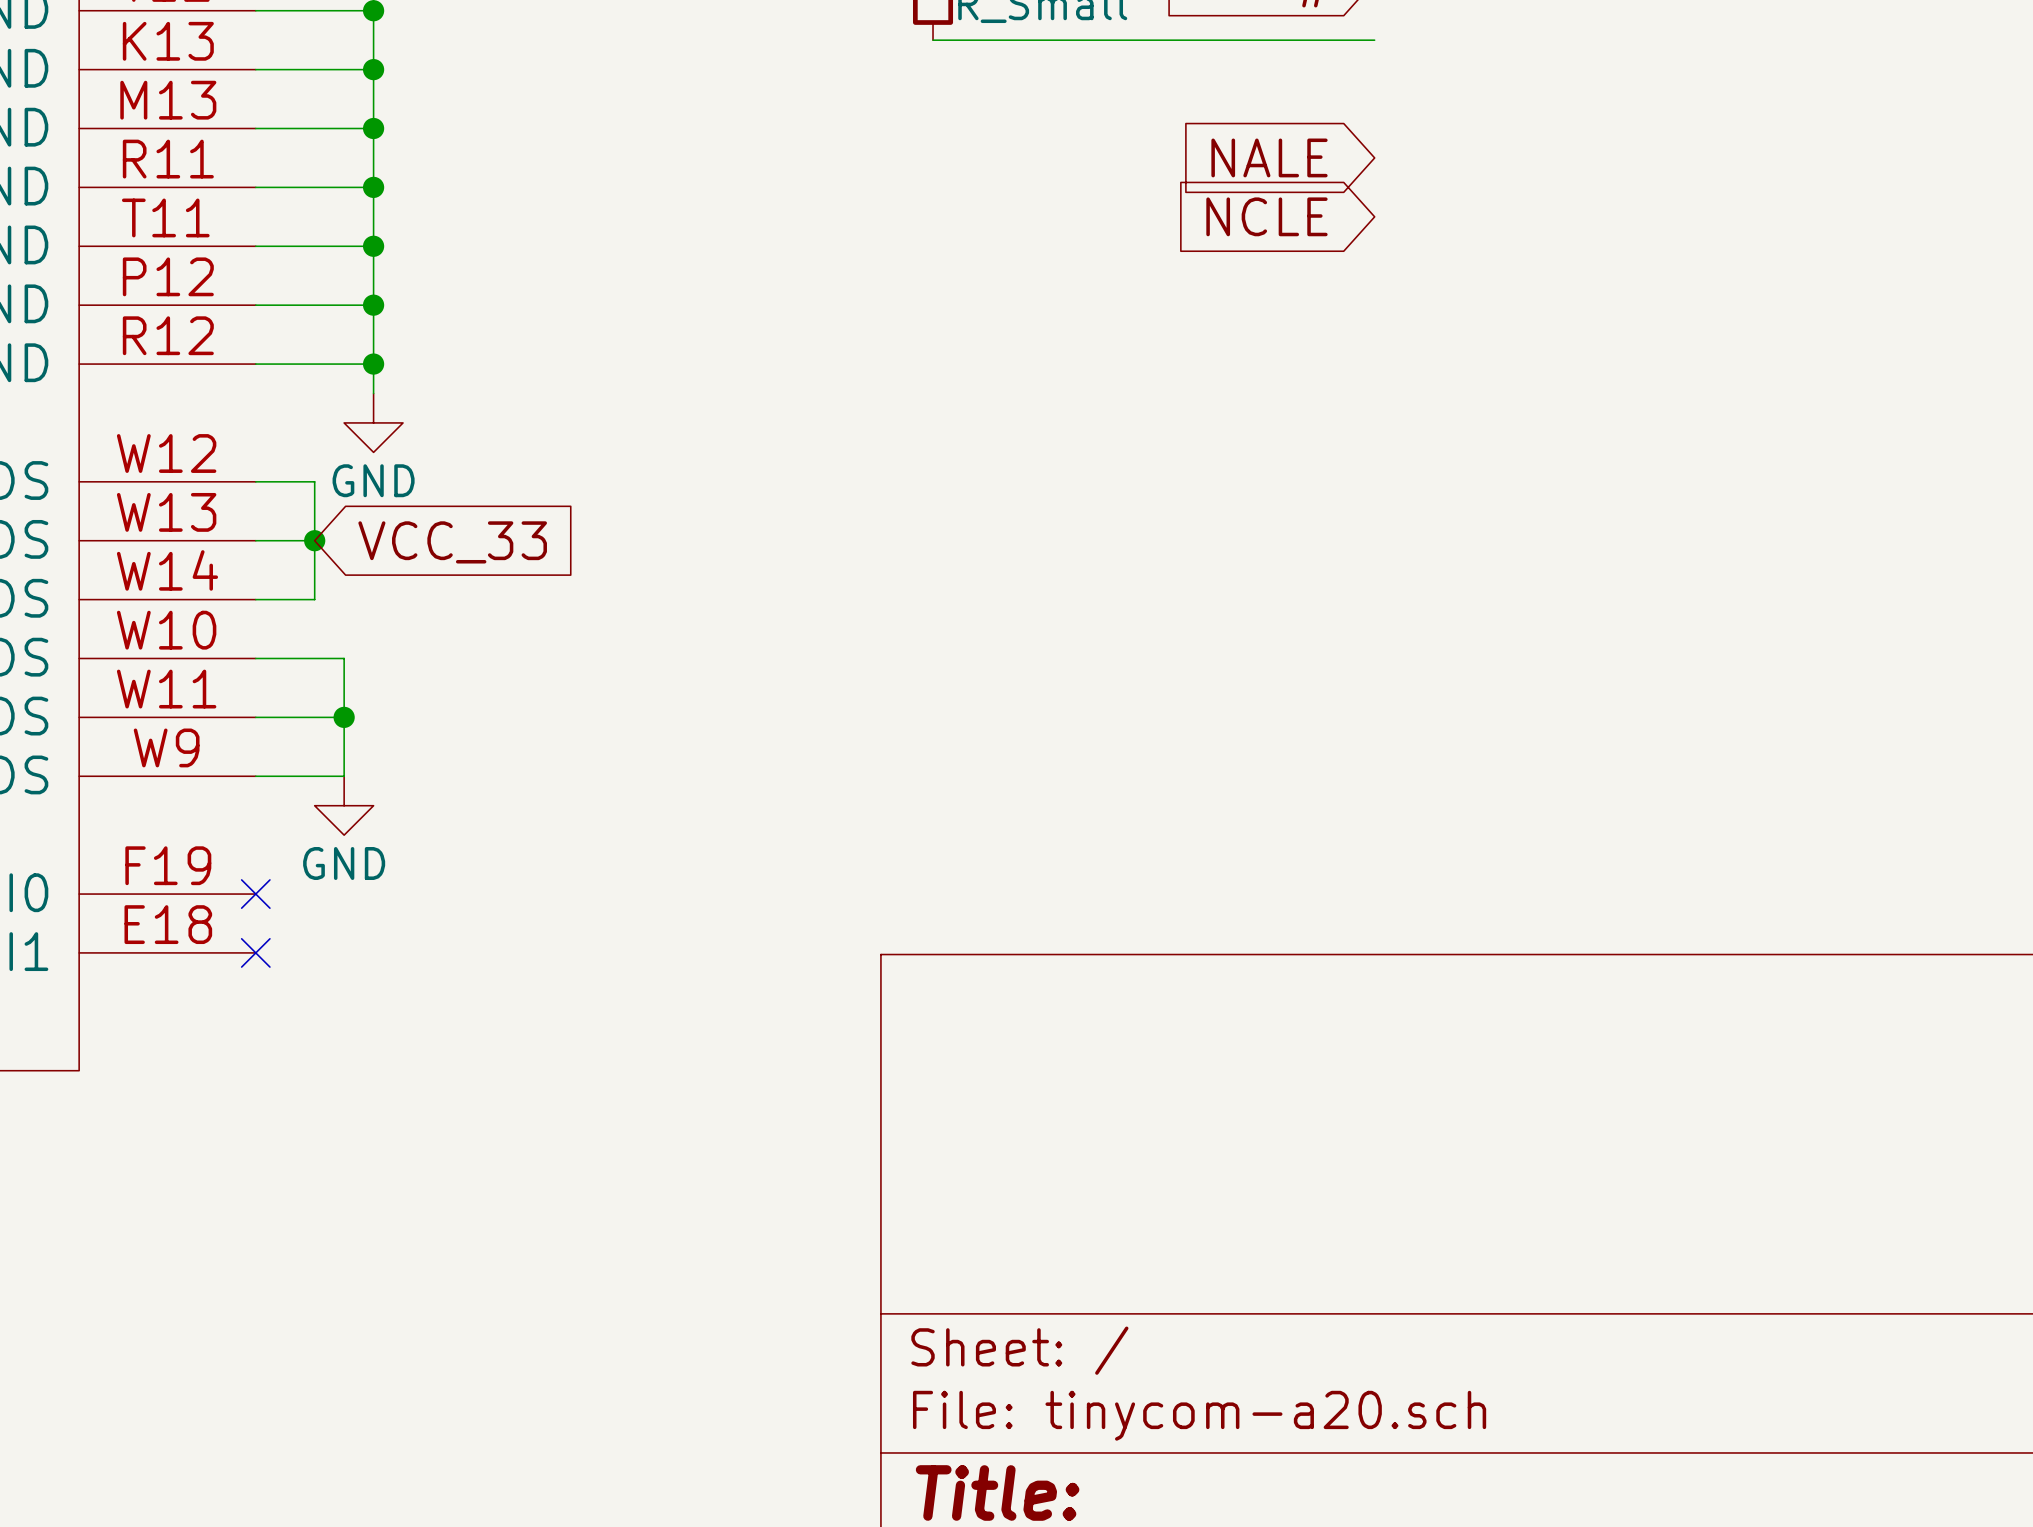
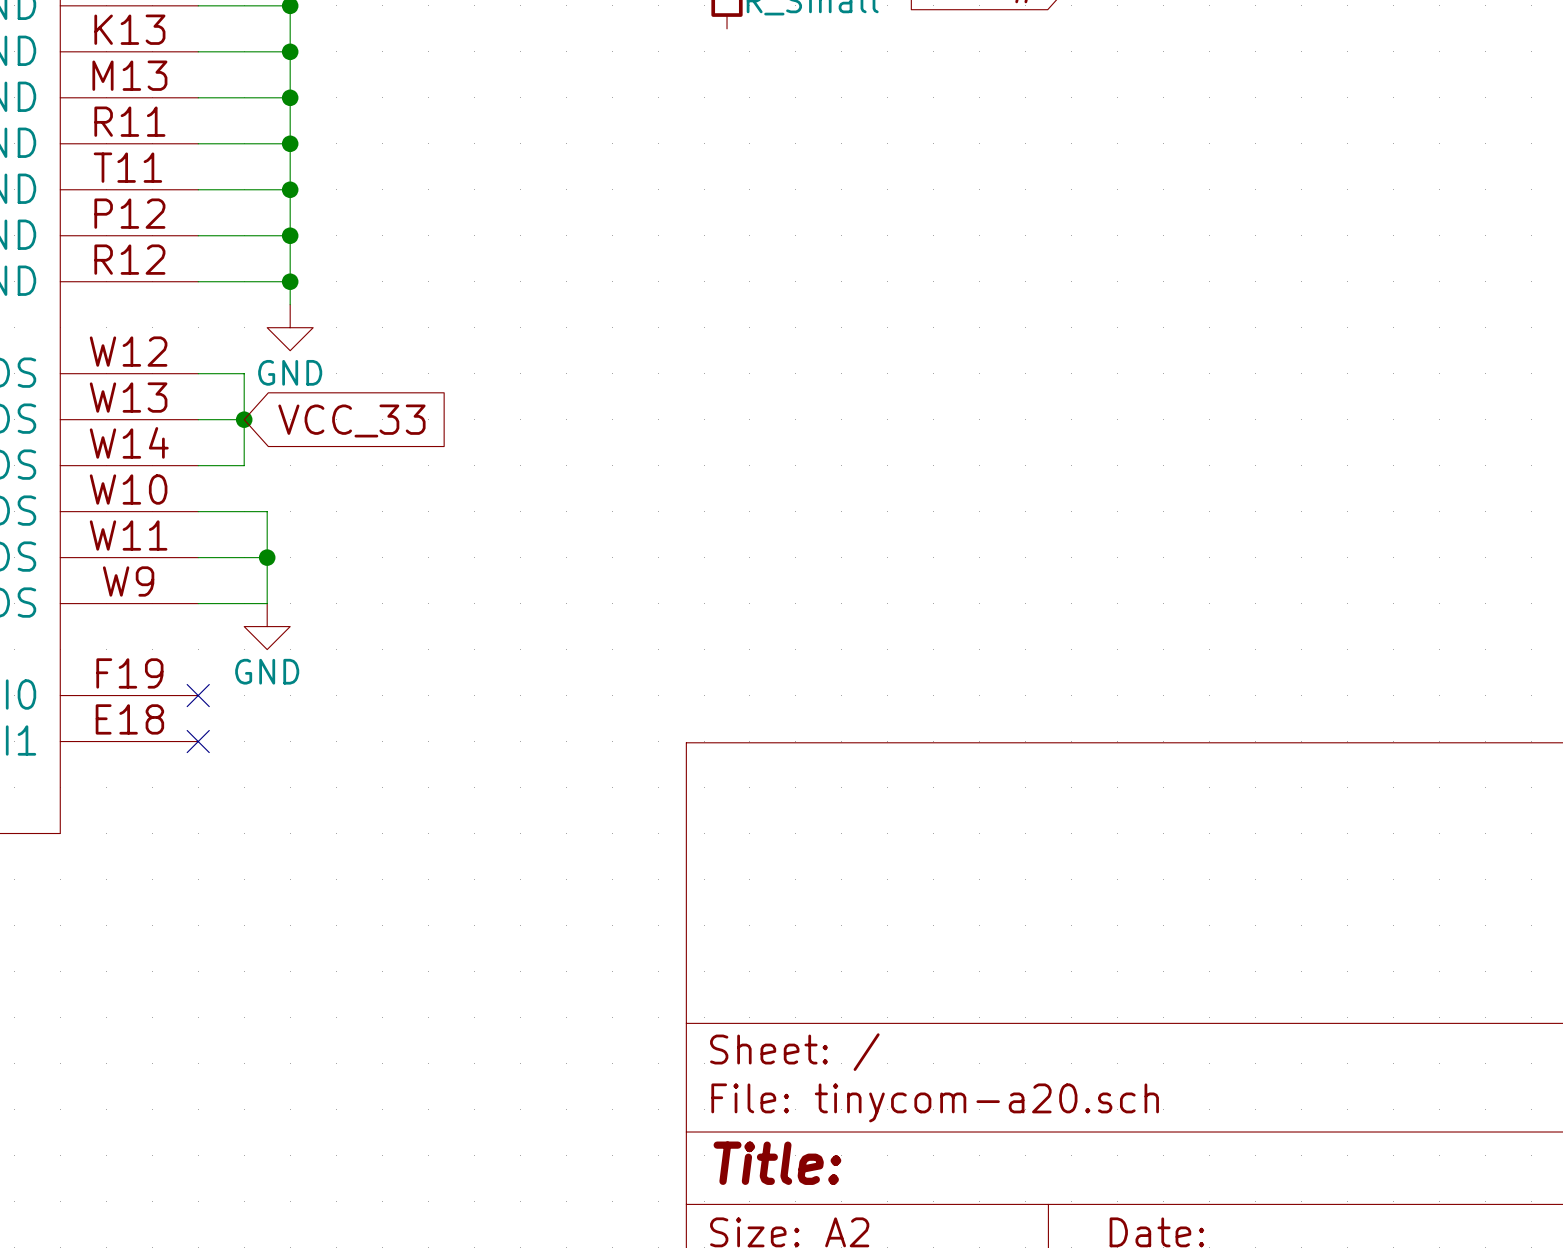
wire: (933, 40) (1374, 40) -> none
global label: NALE (1269, 157) -> none
global label: NCLE (1266, 216) -> none

